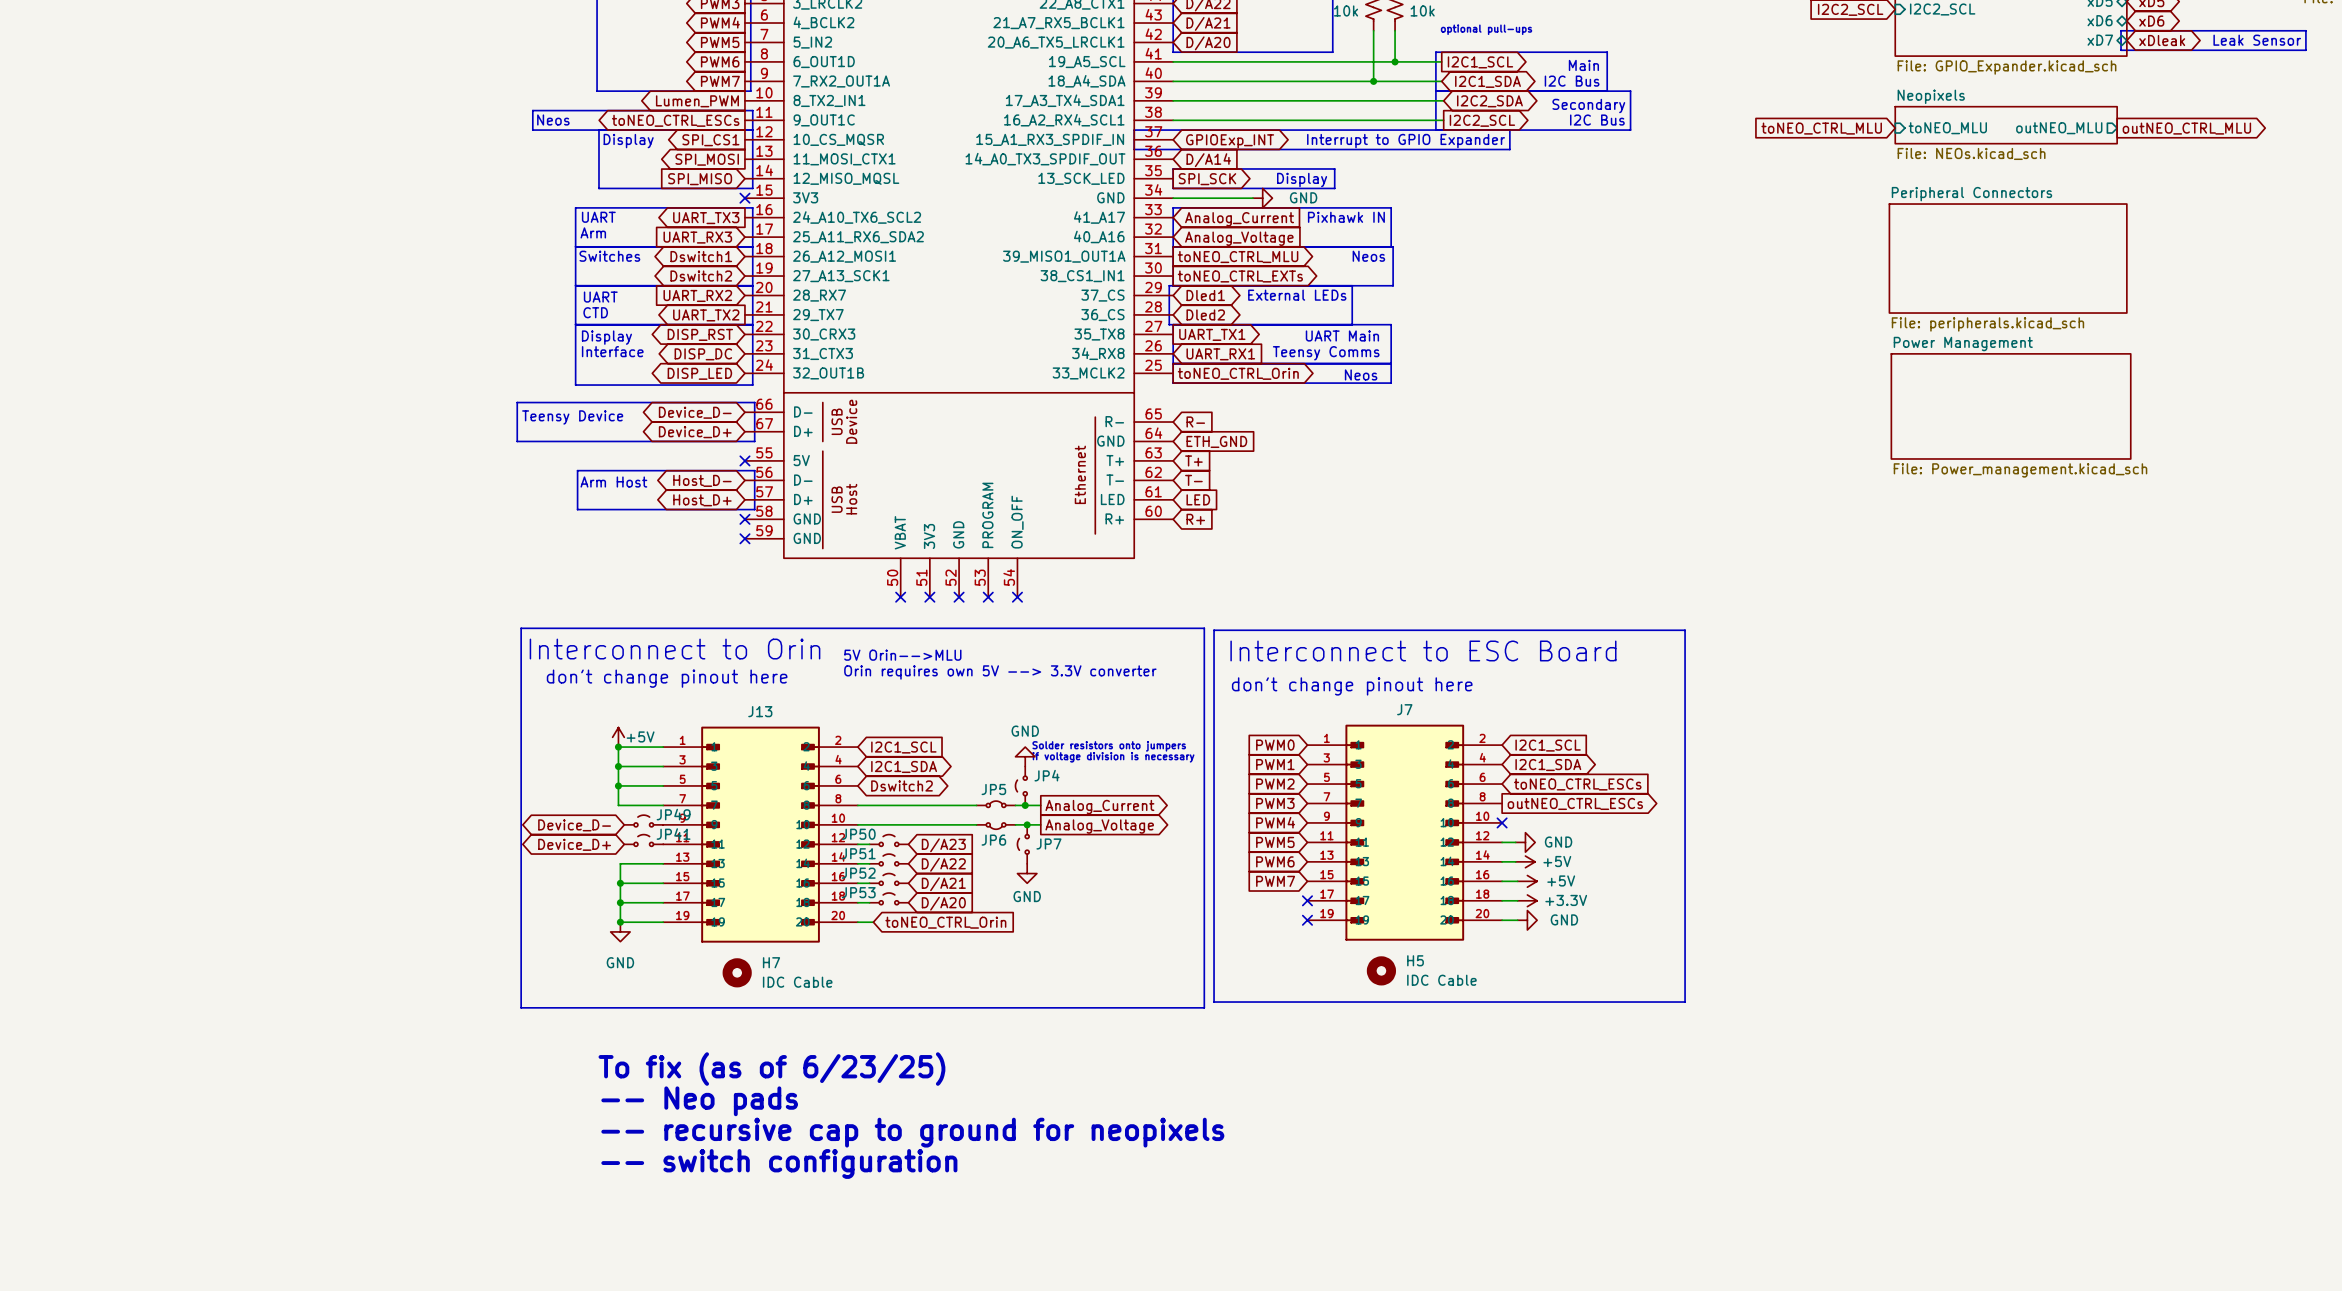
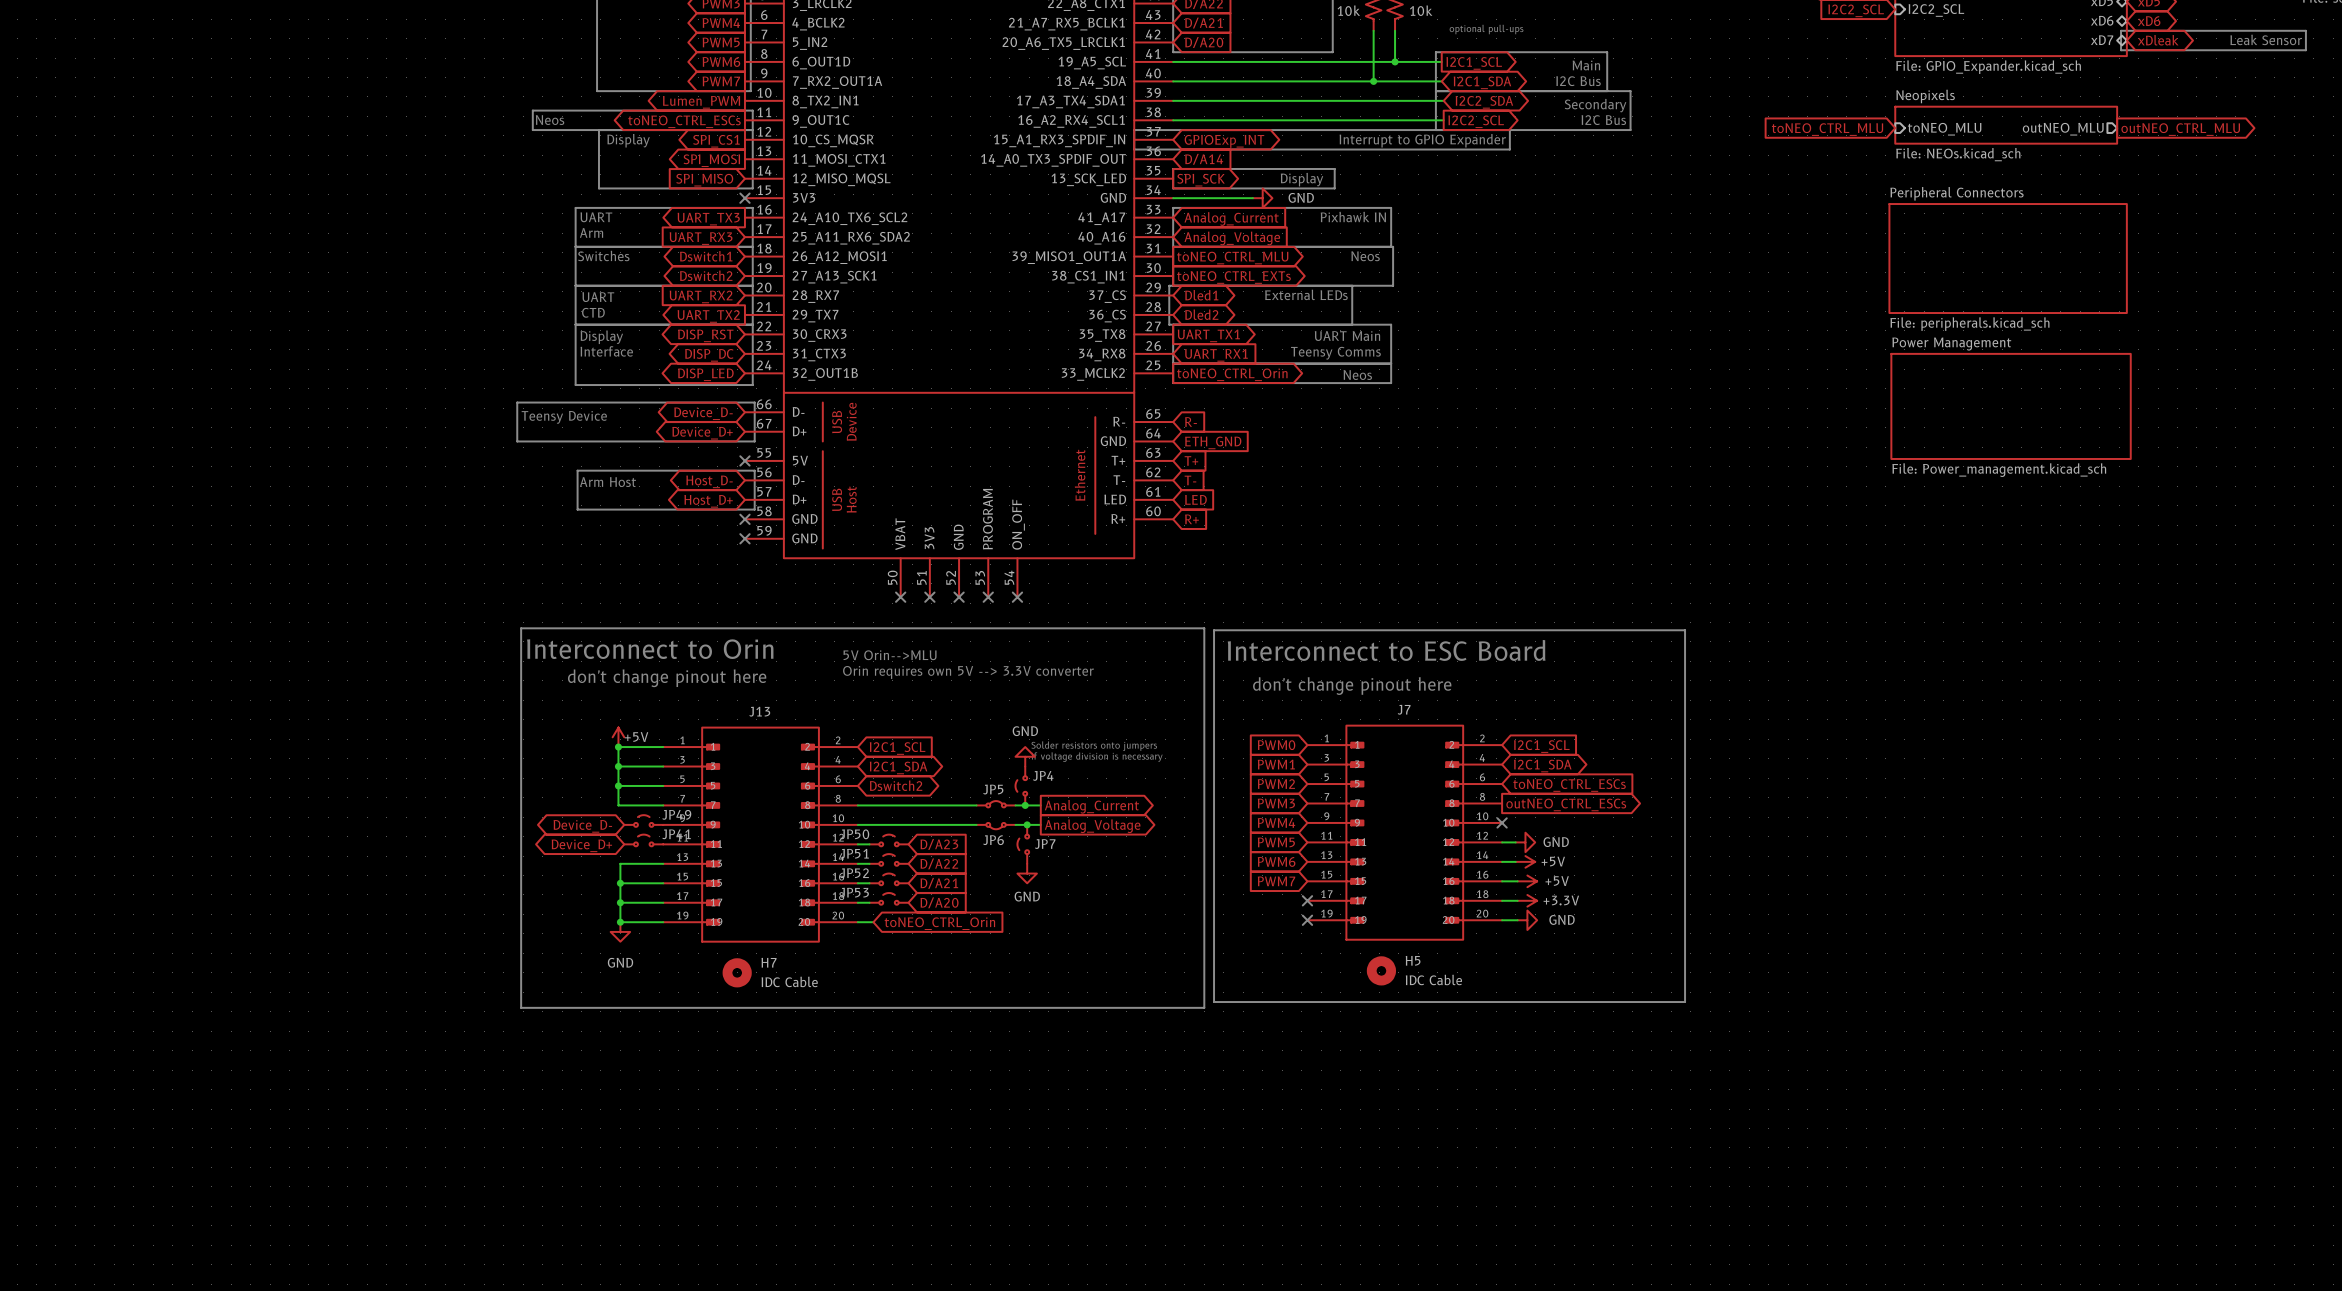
text: To fix (as of 6/23/25) (771, 1069) -> none
text: -- Neo pads (699, 1101) -> none
text: -- recursive cap to ground for neopixels (912, 1132) -> none
text: -- switch configuration (779, 1163) -> none

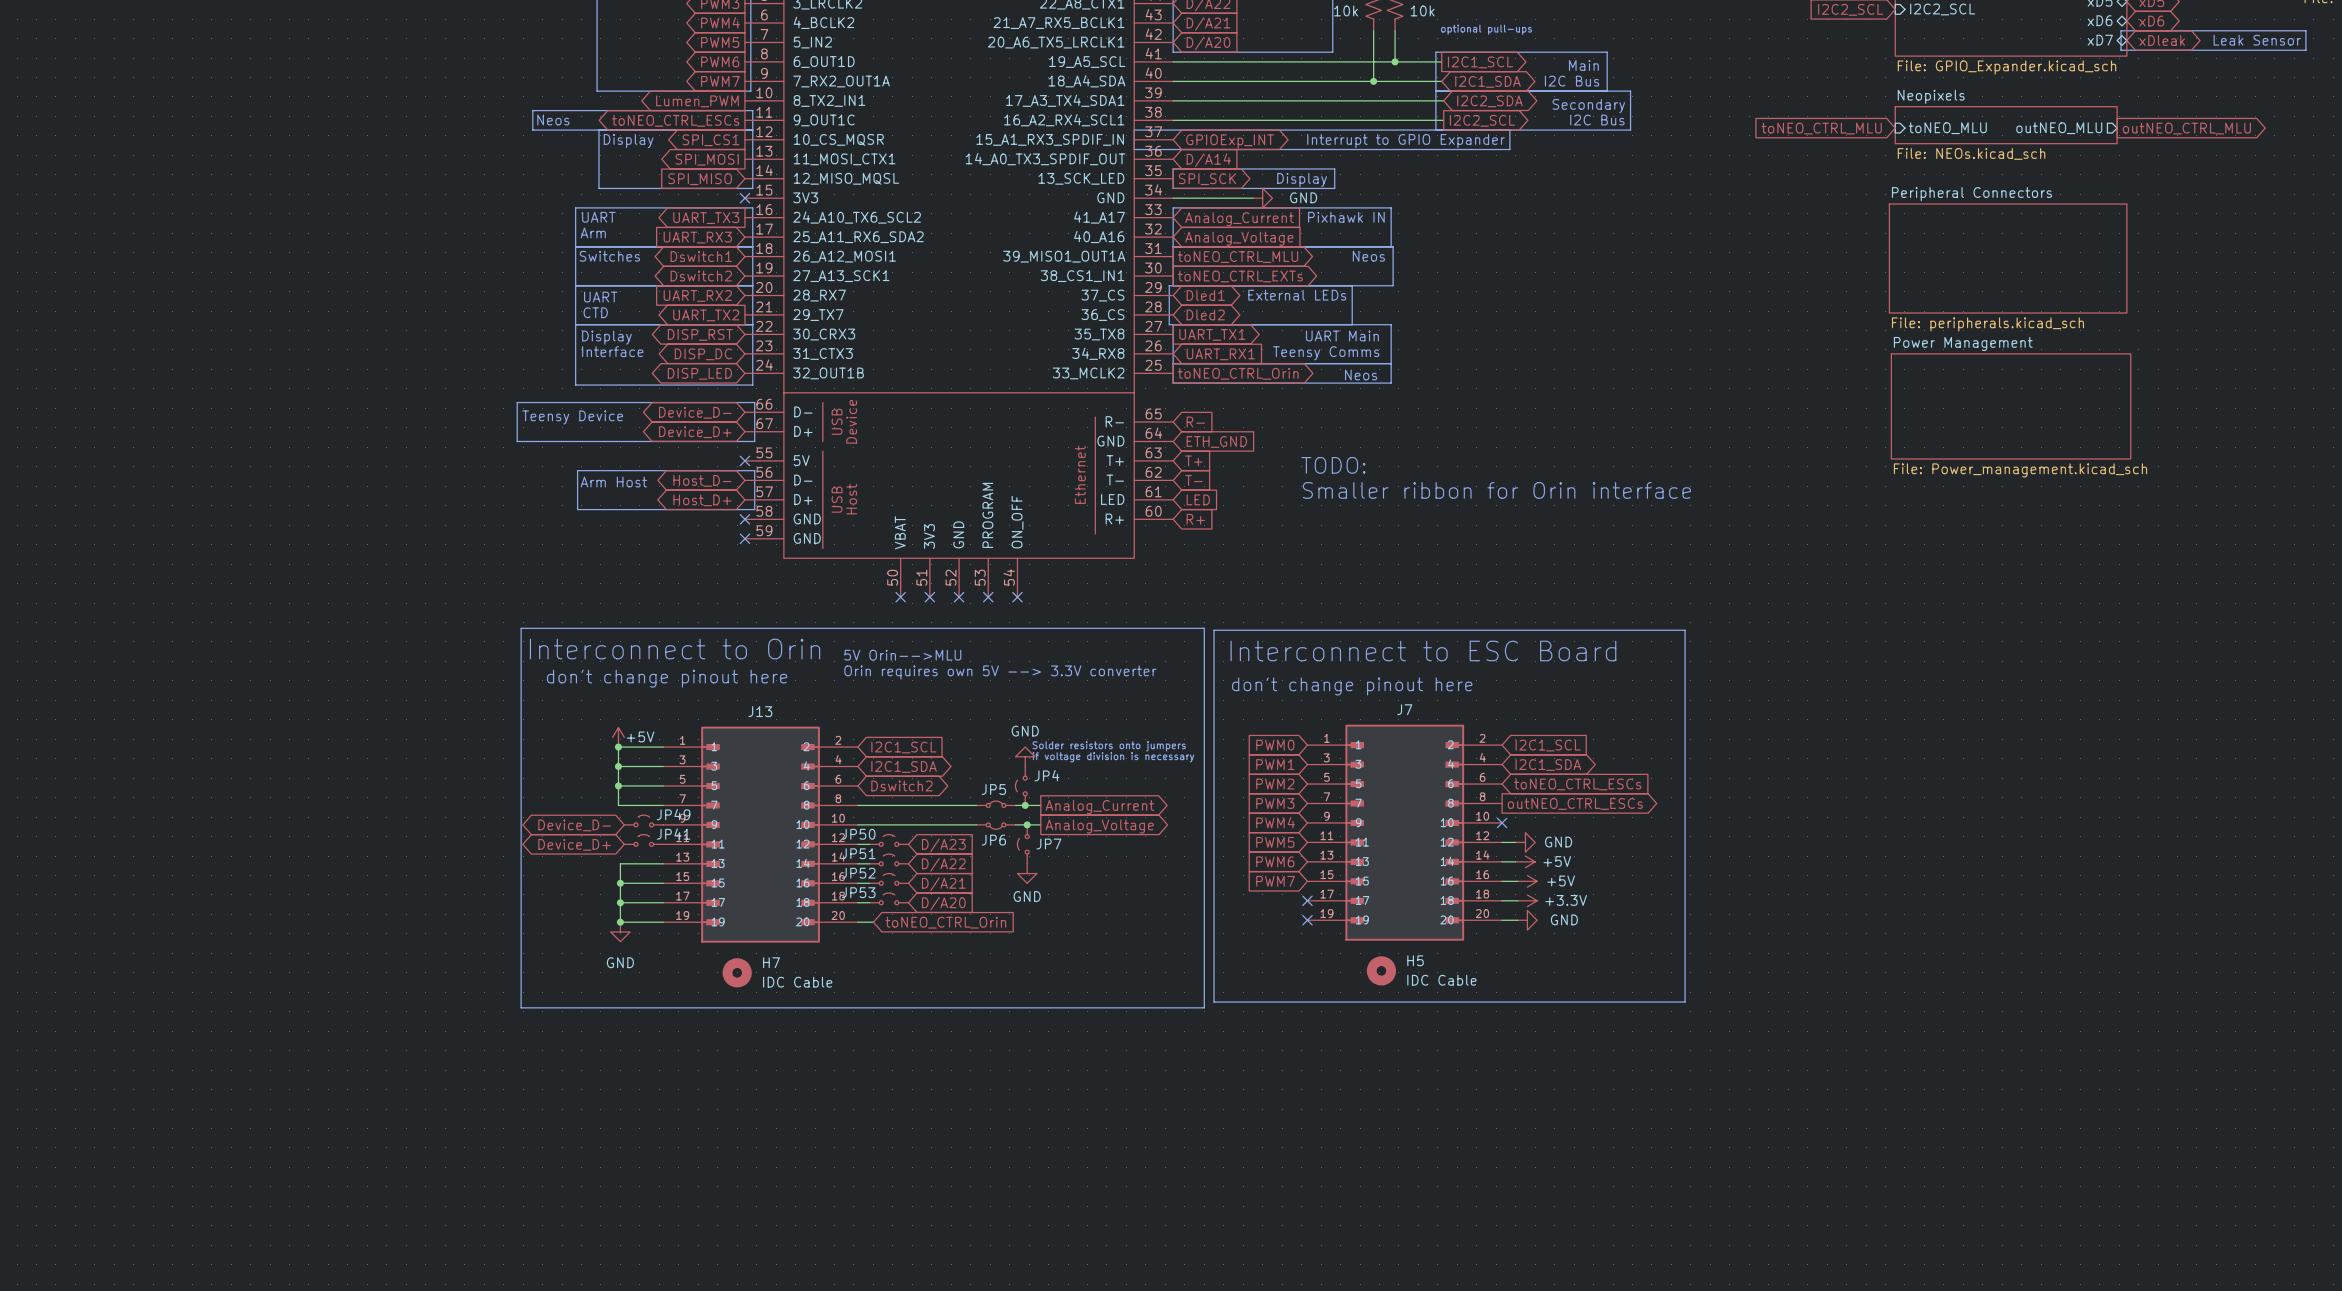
text: none -> TODO: (1333, 465)
text: none -> Smaller ribbon for Orin interface (1496, 490)

